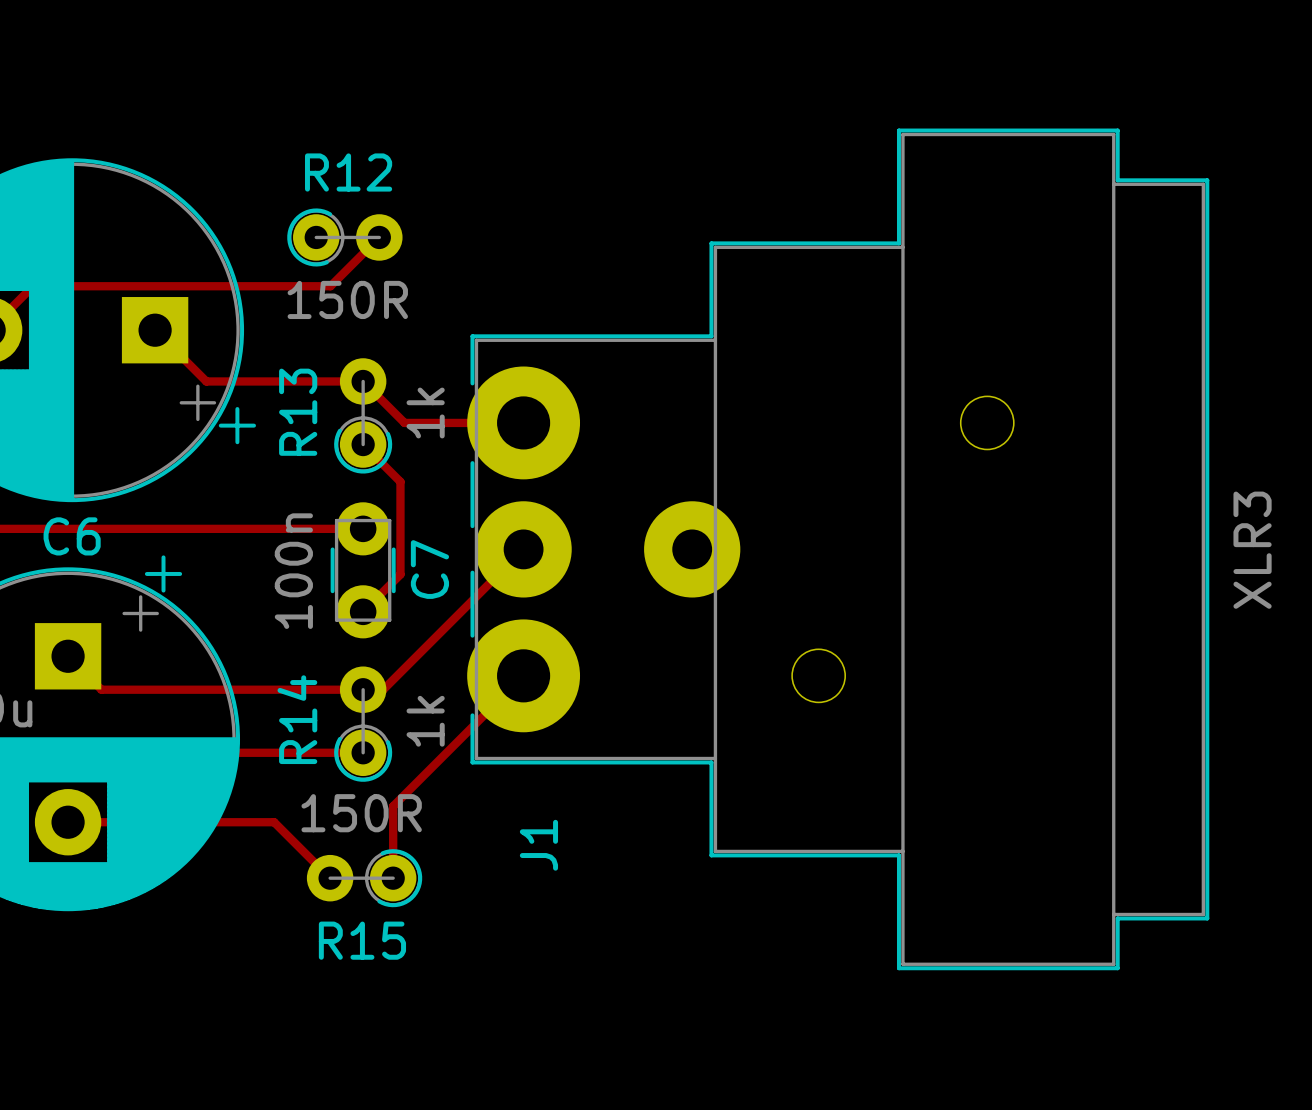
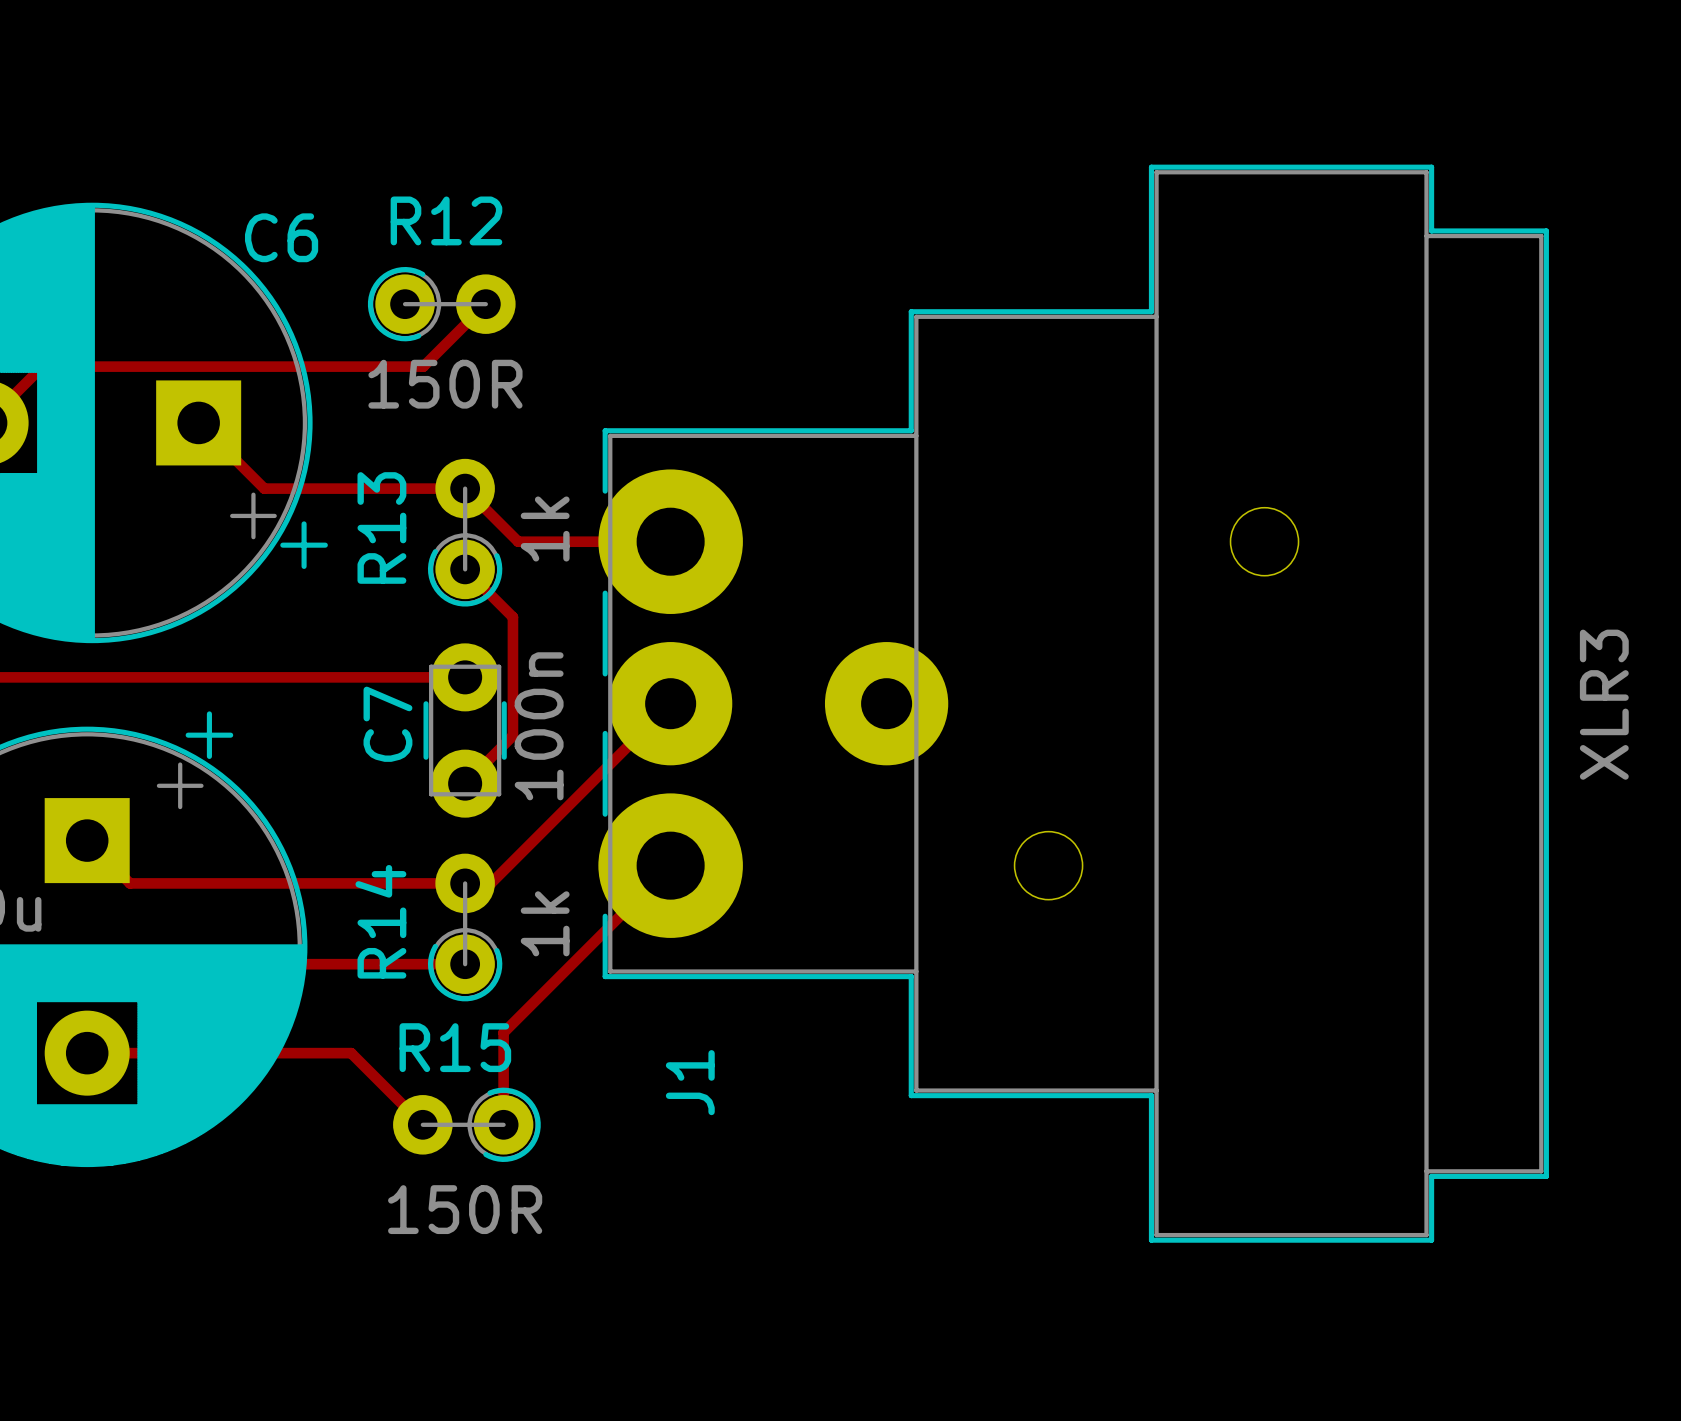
C6 name position: C6 (72, 536) -> C6 (281, 237)
C7 name position: C7 (429, 569) -> C7 (387, 724)
C7 value position: 100n (293, 571) -> 100n (539, 726)
R15 value position: 150R (361, 813) -> 150R (465, 1209)
R15 name position: R15 (362, 940) -> R15 (455, 1047)

